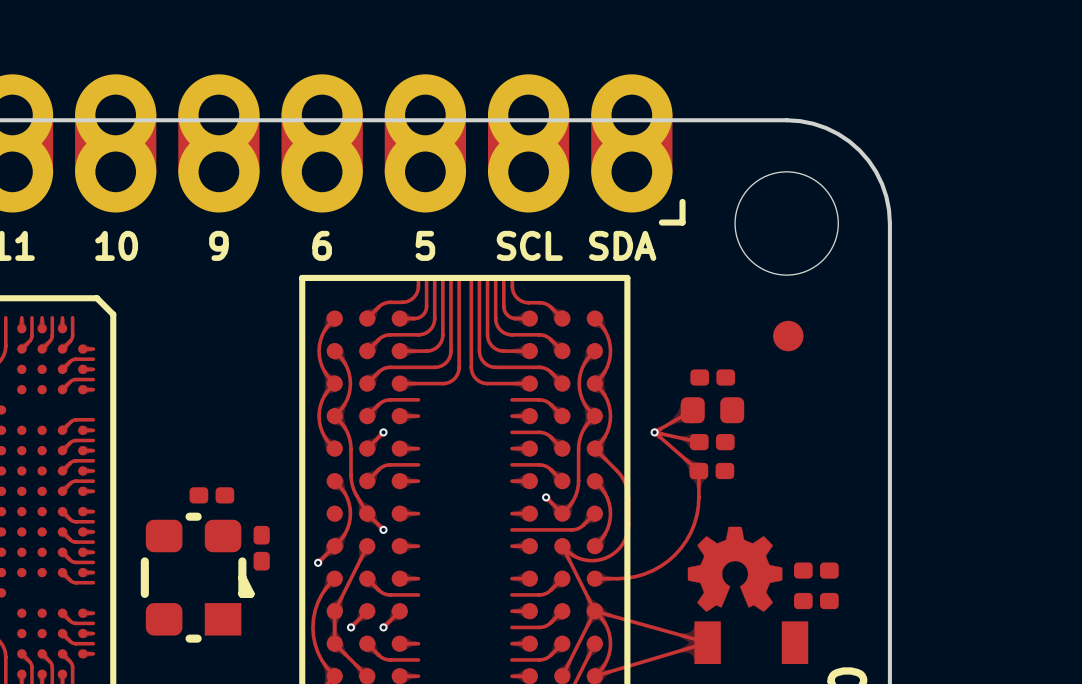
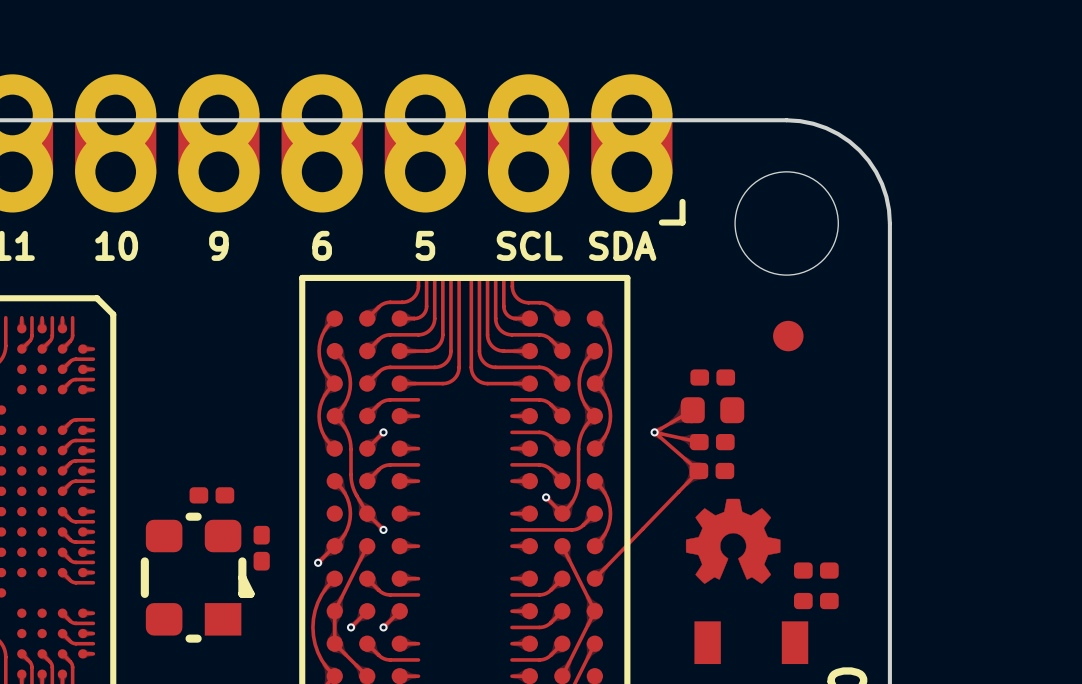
track: (594, 448) (619, 473) (626, 487) (628, 524) (626, 536) (619, 547) (613, 553) (597, 560) (584, 559) (576, 557) (562, 546) -> none
track: (698, 470) (696, 515) (686, 540) (675, 554) (660, 566) (644, 574) (626, 578) (594, 578) -> (698, 470) (594, 578)
drawing position: (735, 569) -> (733, 541)
track: (594, 611) (607, 628) (610, 643) (607, 659) (594, 676) (707, 642) (594, 611) -> none

